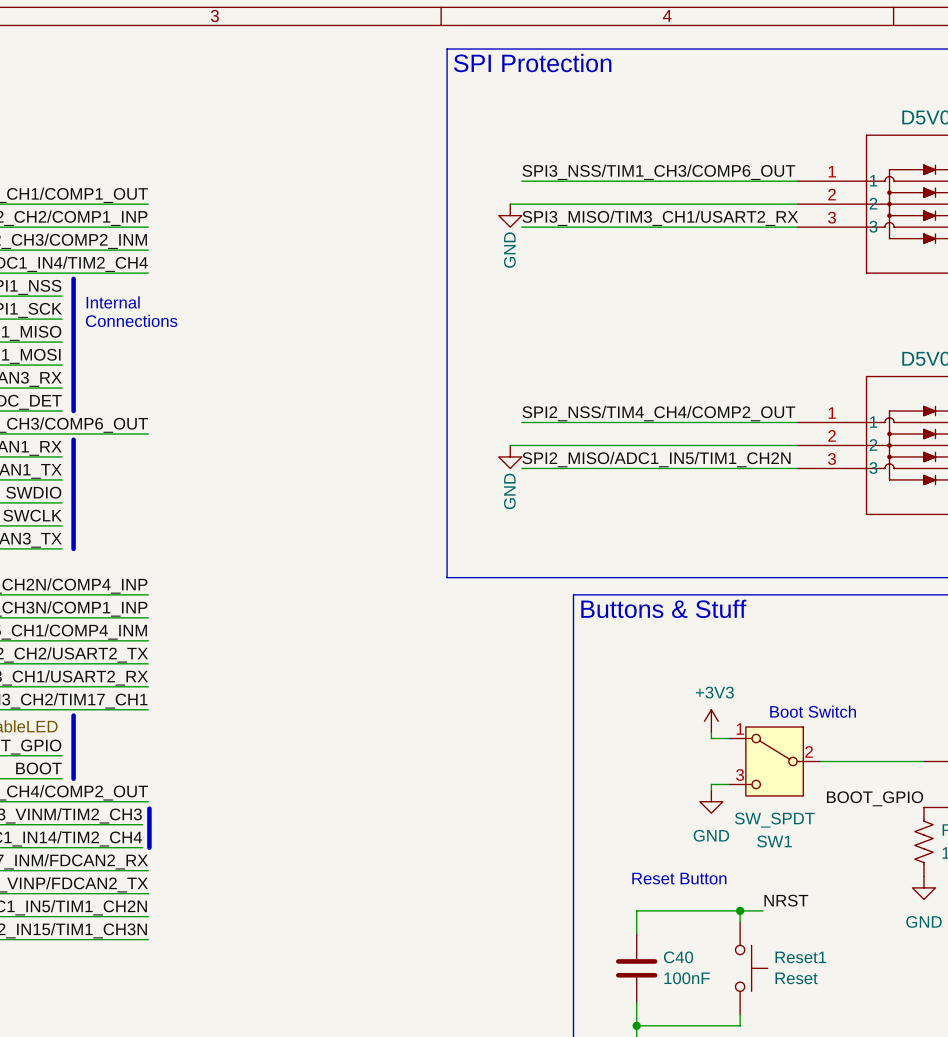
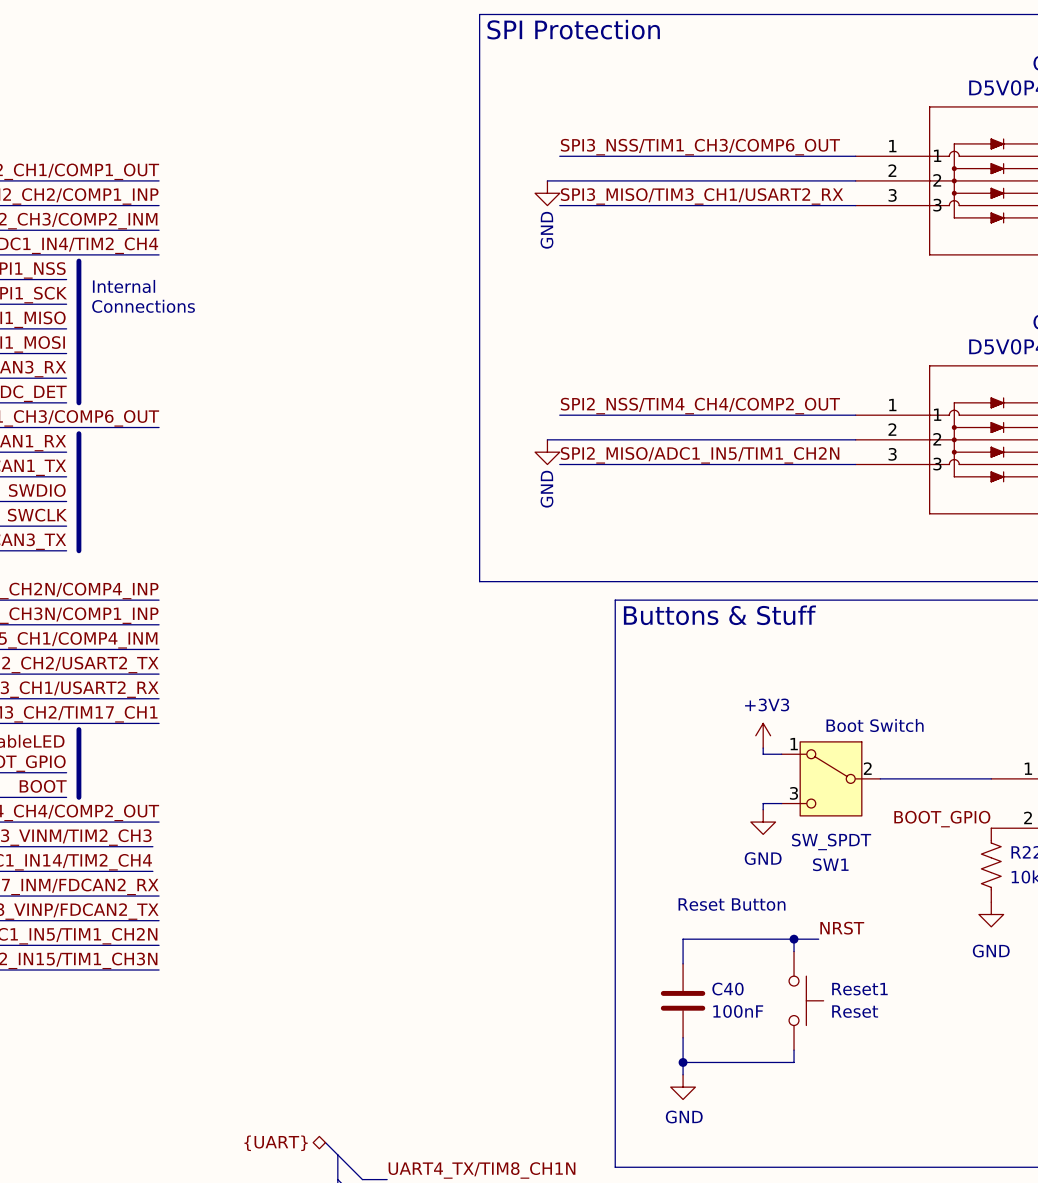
line: (149, 808) (149, 847) -> none

